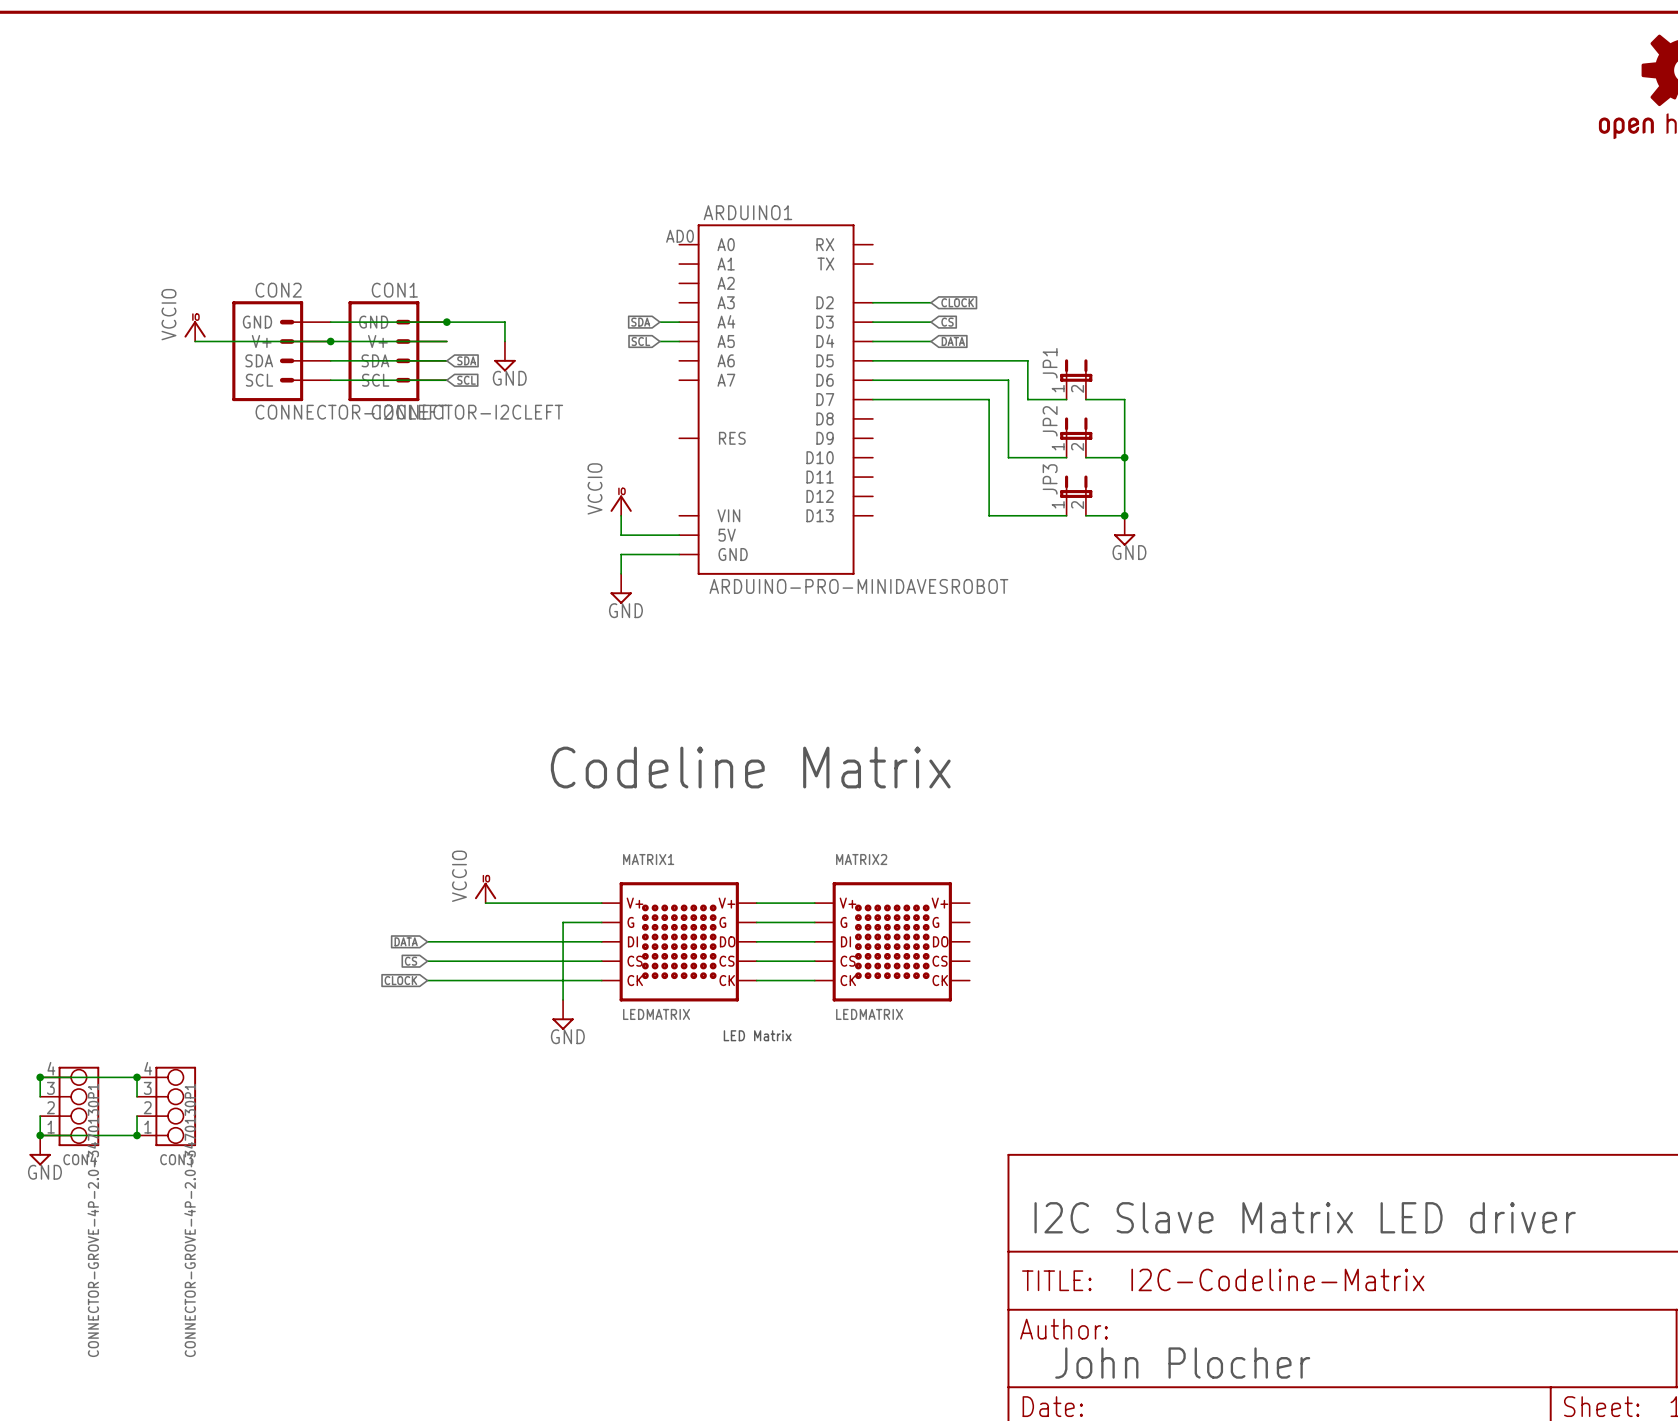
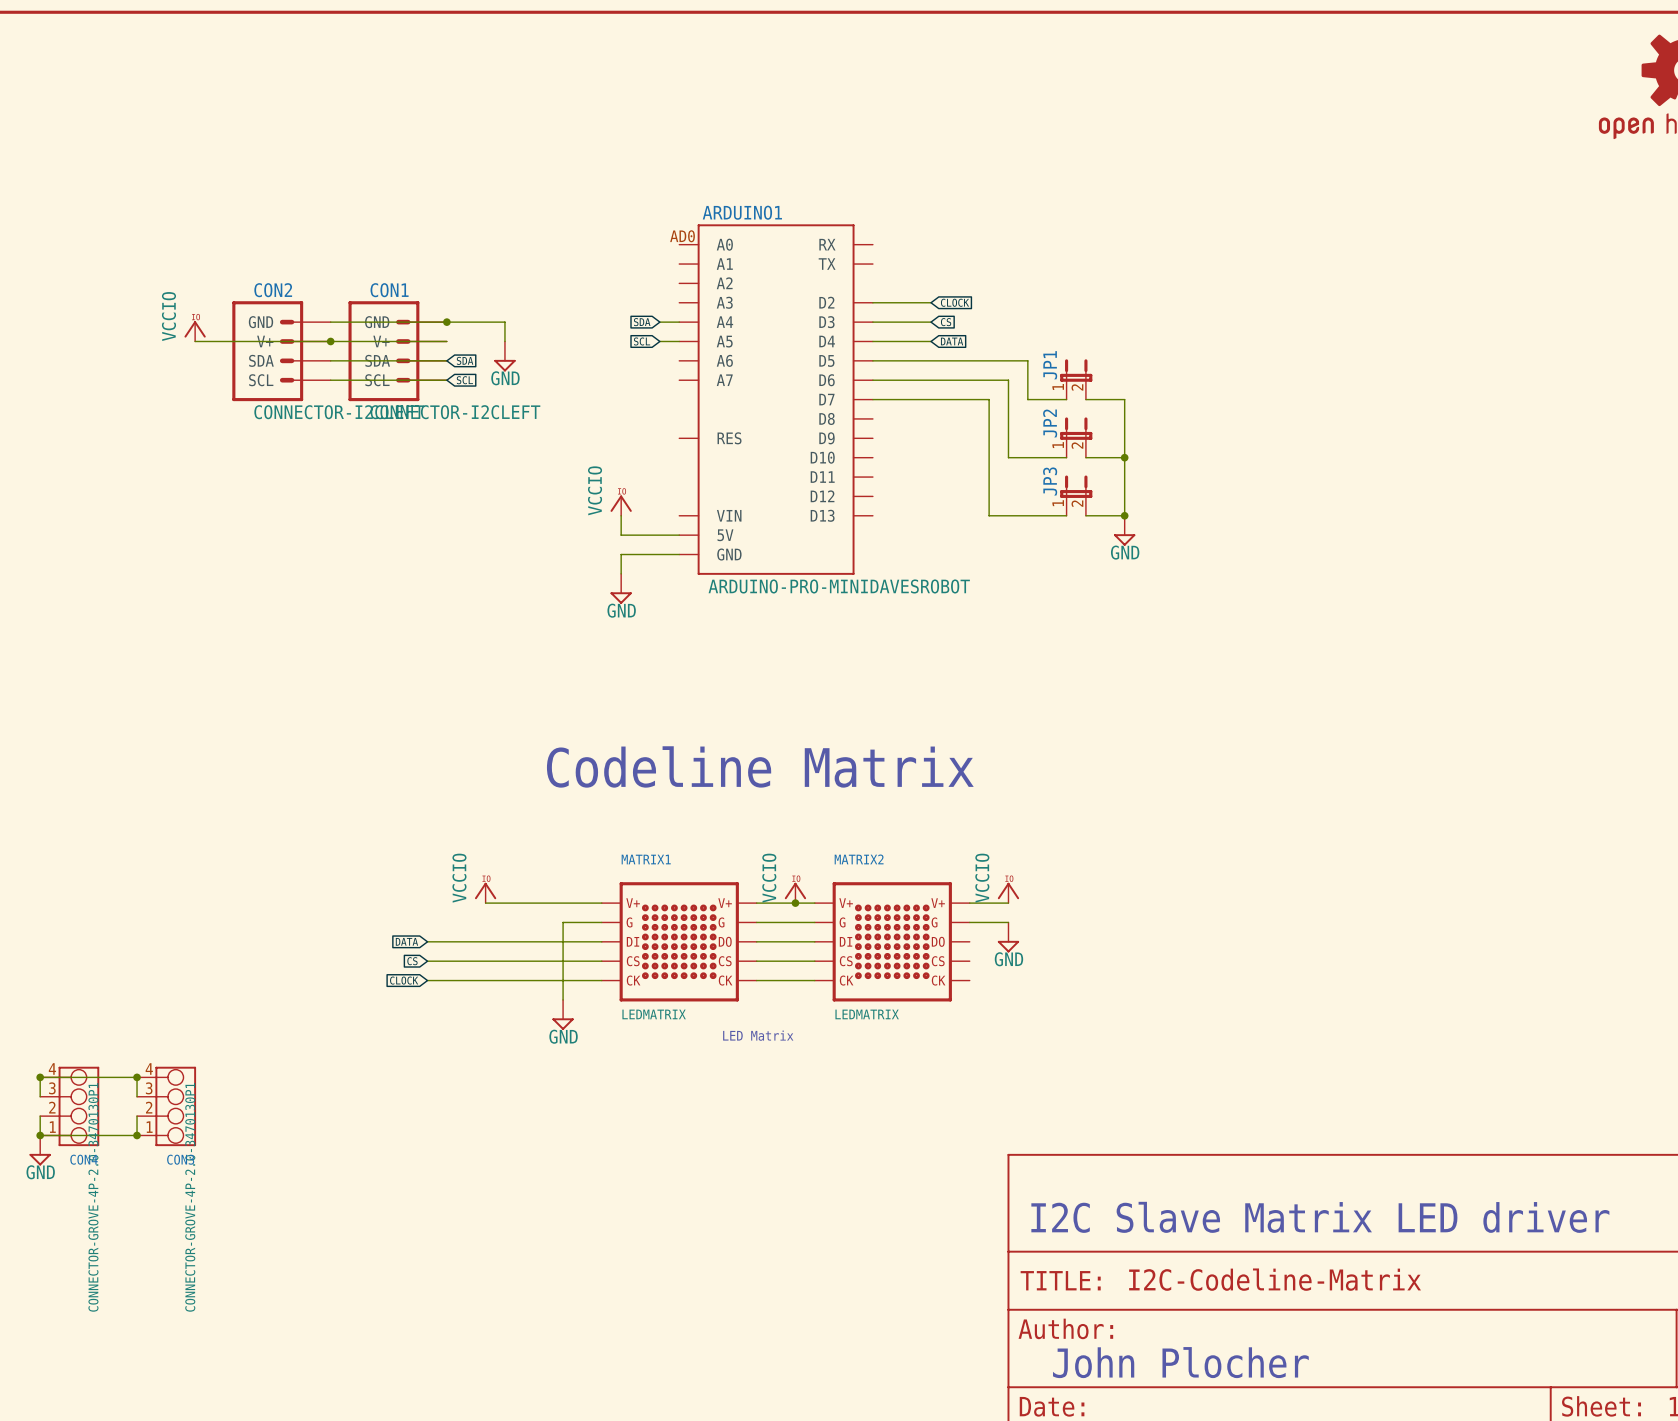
power symbol: none -> VCCIO (795, 892)
power symbol: none -> VCCIO (1008, 892)
junction: none -> (795, 903)
wire: none -> (969, 903) (1008, 903)
wire: none -> (969, 922) (1008, 922)
power symbol: none -> GND (1008, 937)

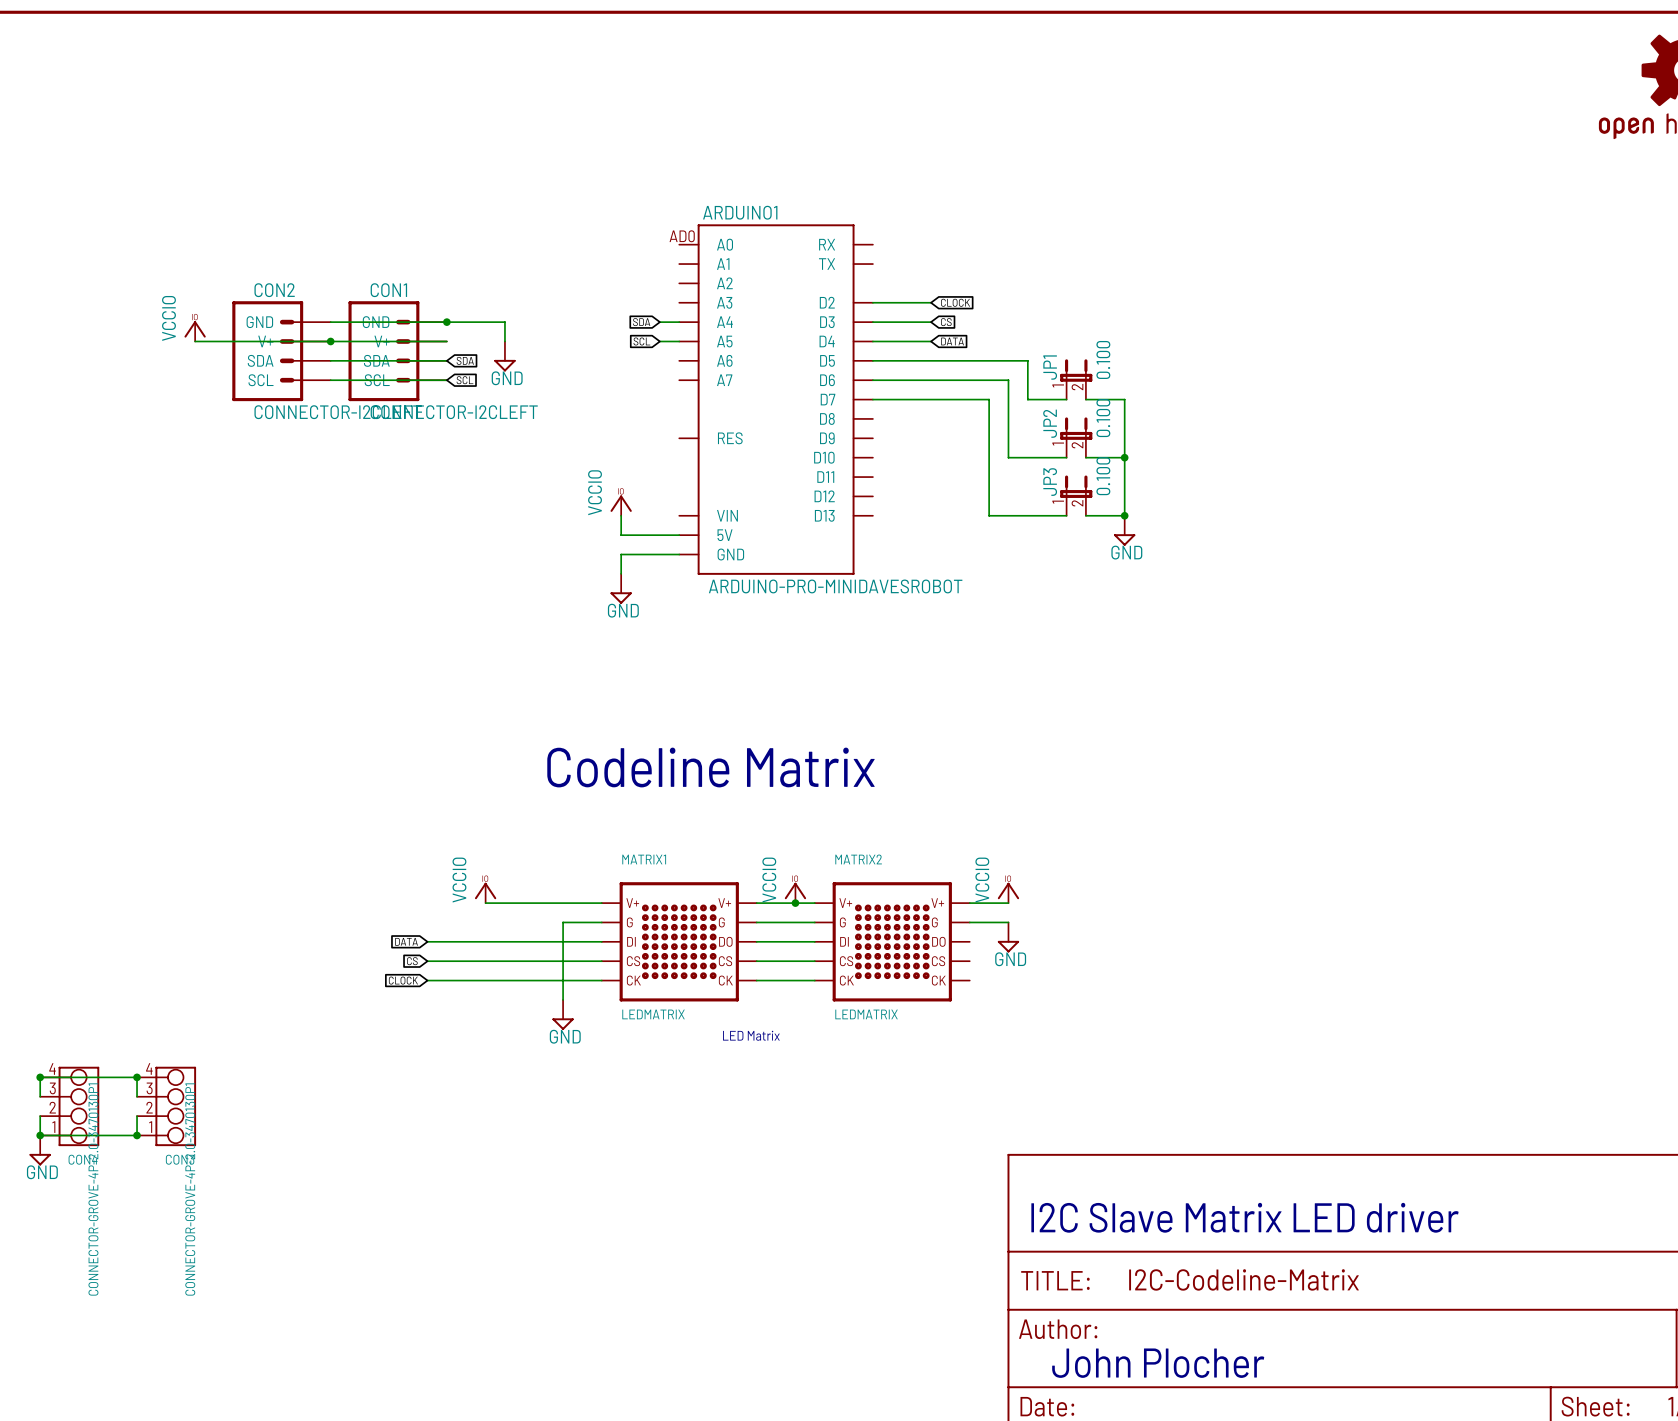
JP1 value: none -> 0.100 (1103, 359)
JP2 value: none -> 0.100 (1103, 418)
JP3 value: none -> 0.100 (1103, 476)

